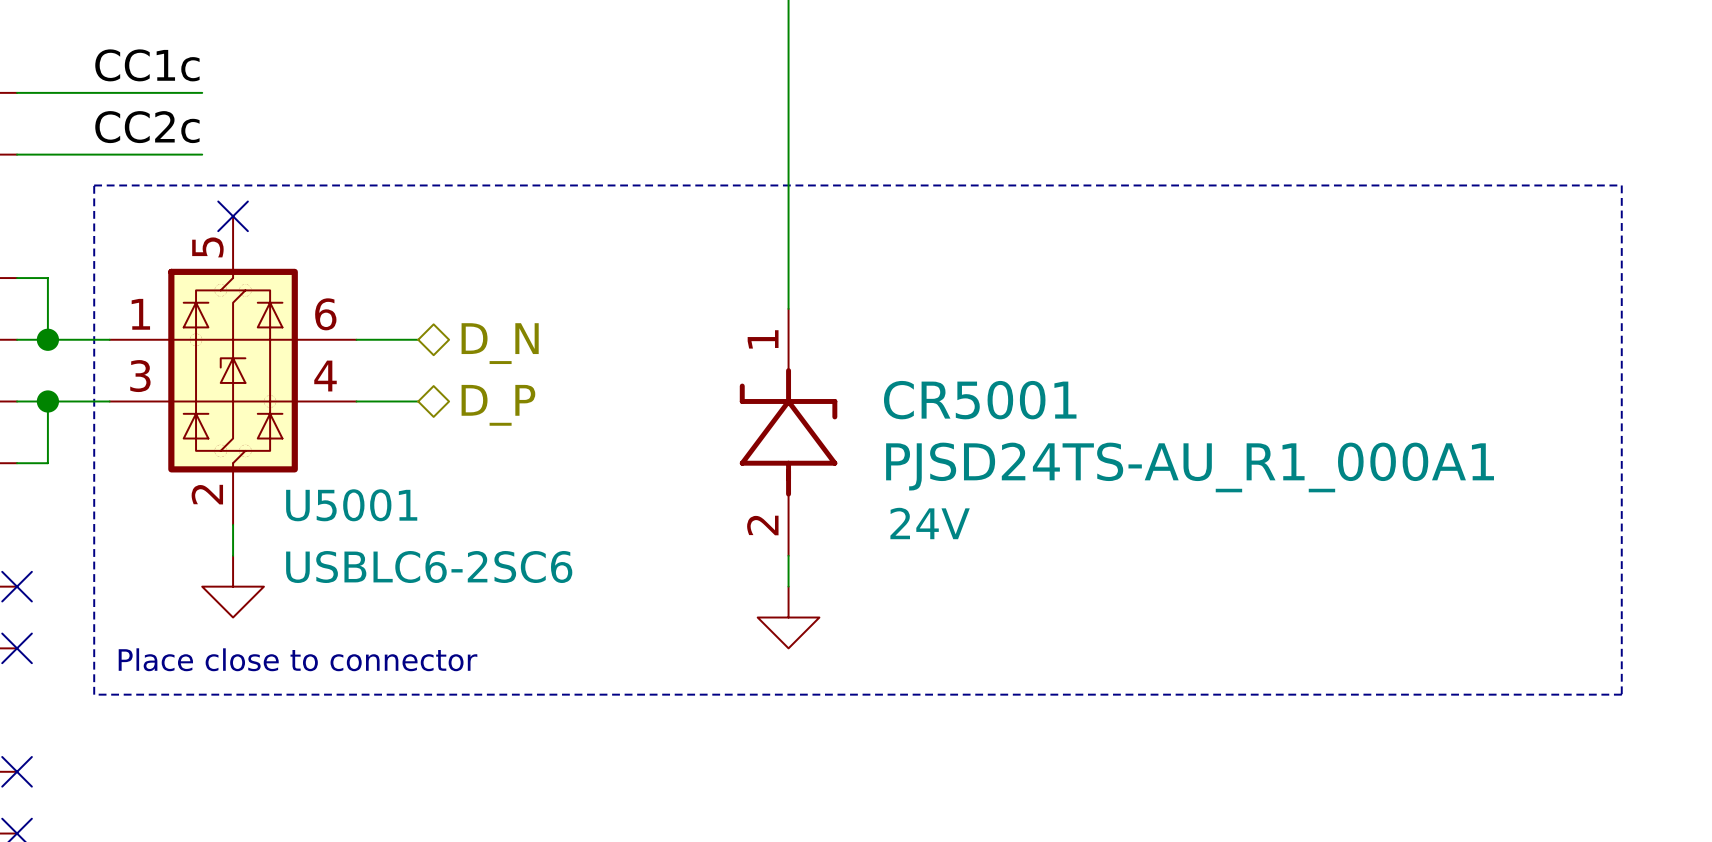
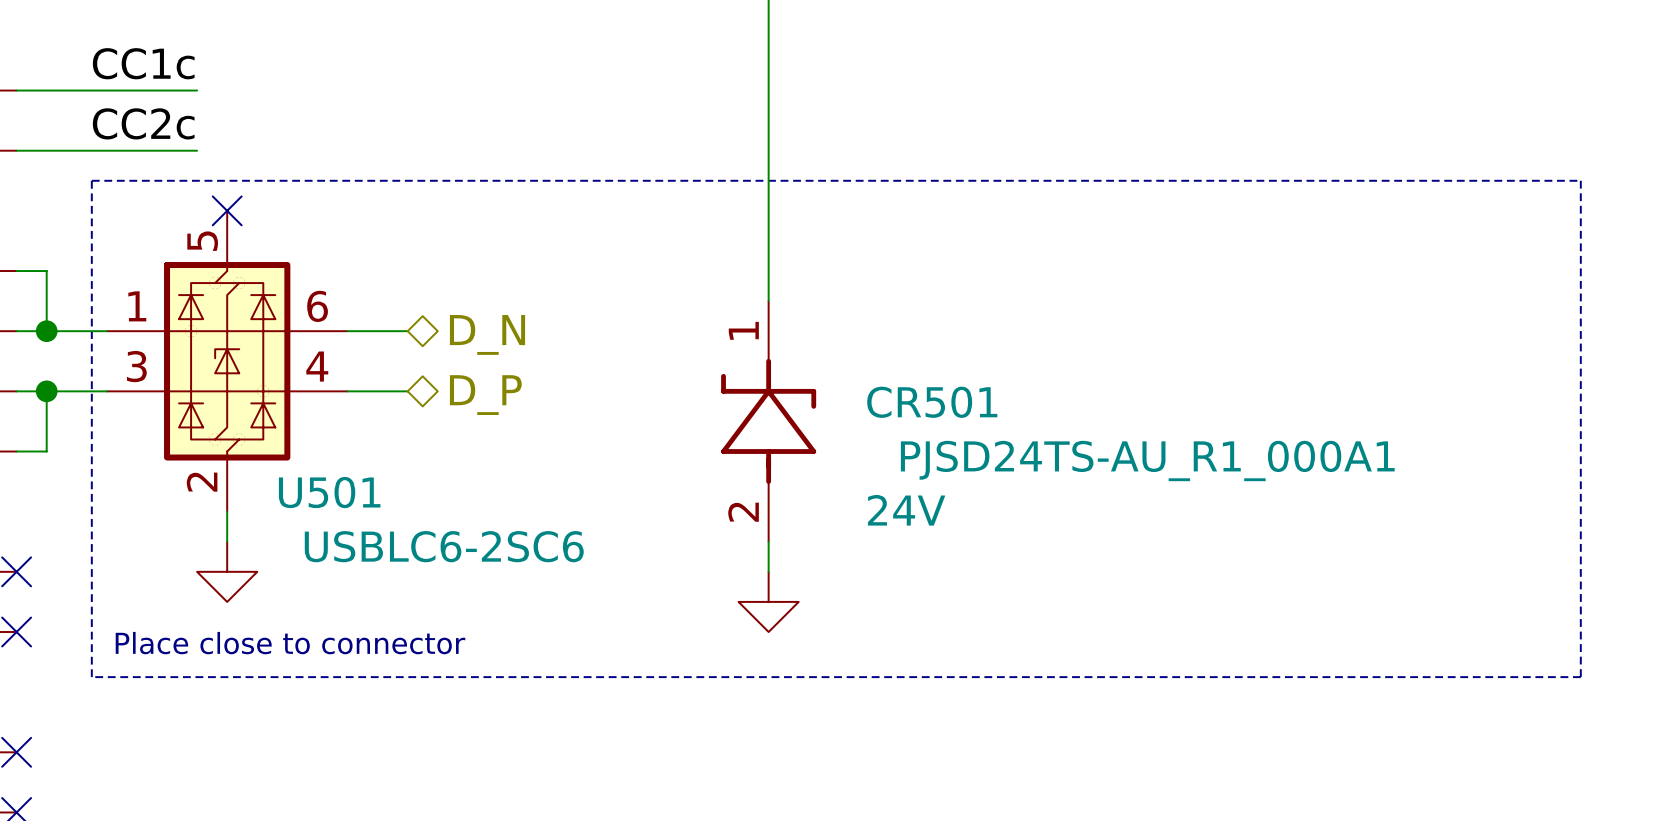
CR5001 name: CR5001 (980, 400) -> CR501 (932, 402)
CR5001 value: PJSD24TS-AU_R1_000A1 (1190, 467) -> none
CR5001 text: none -> PJSD24TS-AU_R1_000A1 (1147, 460)
U5001 name: U5001 (351, 505) -> U501 (329, 492)
U5001 text: none -> USBLC6-2SC6 (444, 546)
U5001 value: USBLC6-2SC6 (429, 567) -> none

